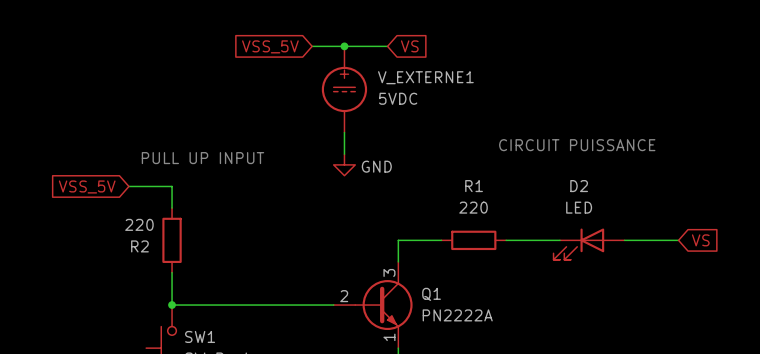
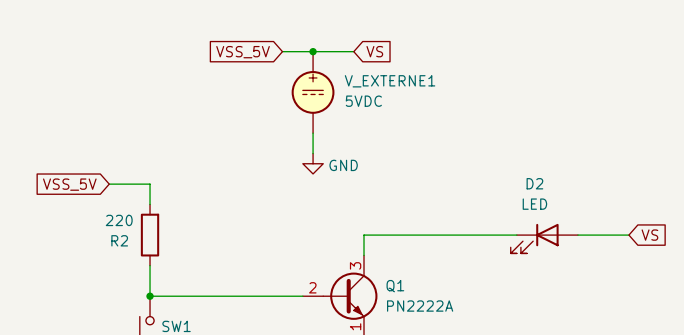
text: CIRCUIT PUISSANCE (577, 145) -> none
text: PULL UP INPUT (202, 158) -> none
wire: none -> (404, 235) (465, 235)
R1: 220 (473, 240) -> none

